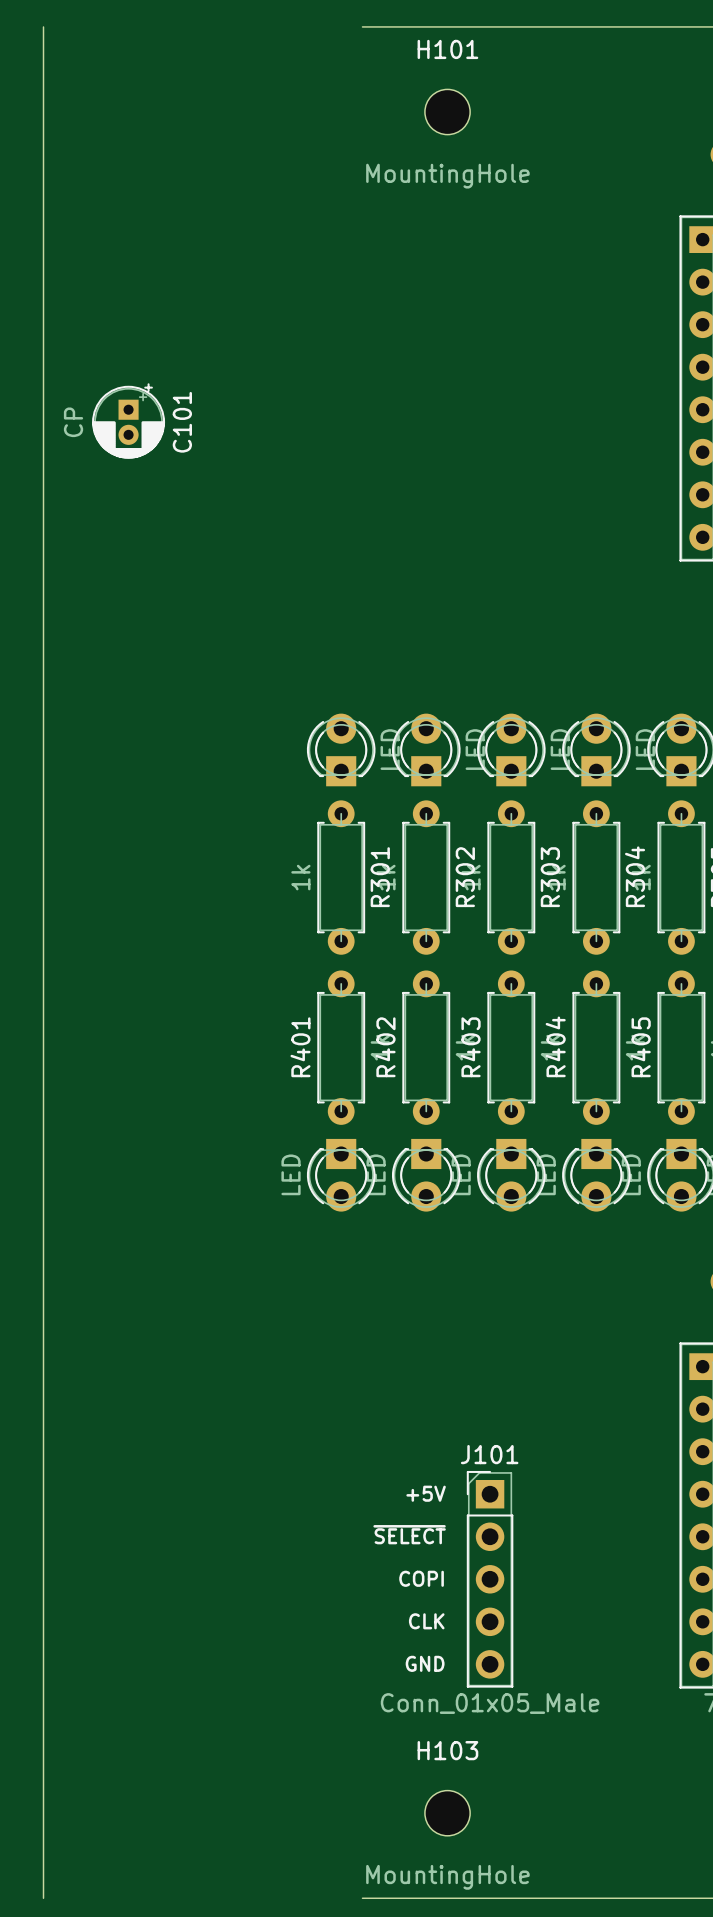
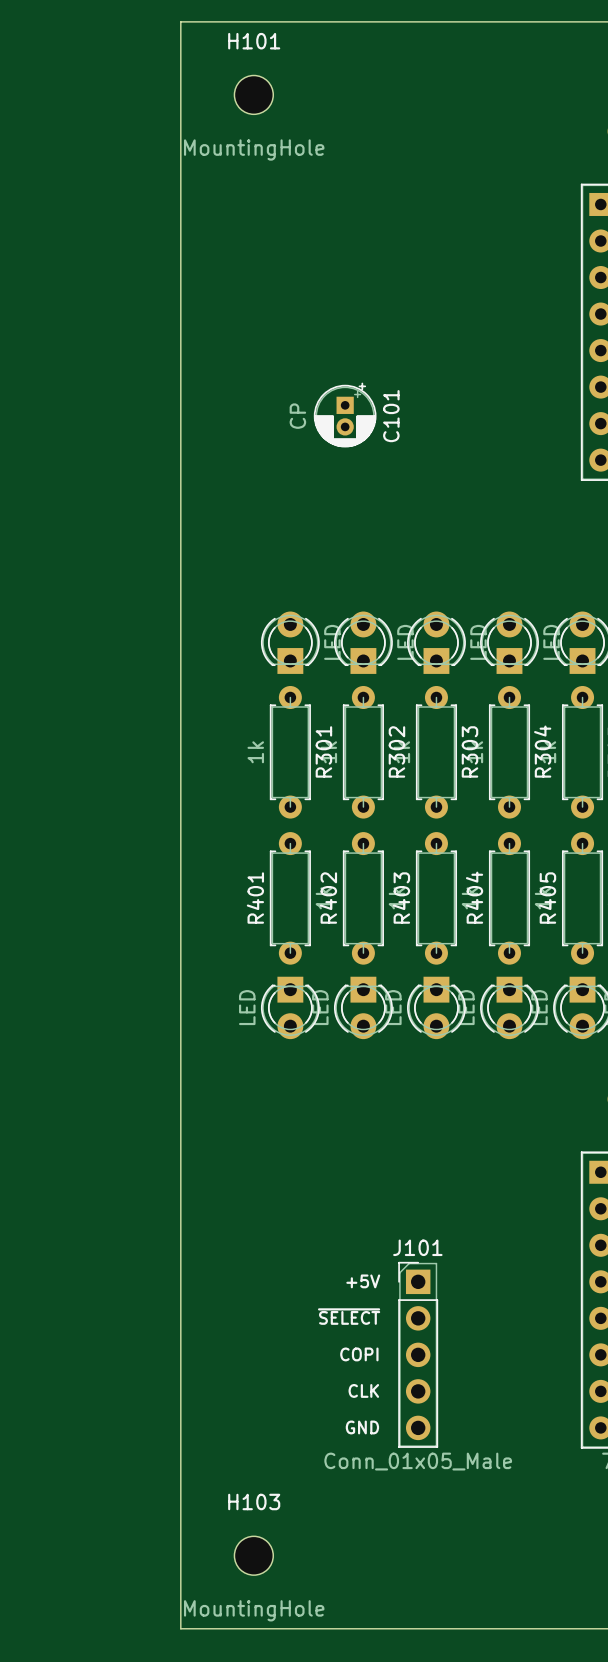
board edge: (43, 26) (43, 1898) -> none
board edge: none -> (308, 21) (180, 21) (180, 1628) (308, 1628)
H101 position: (447, 112) -> (253, 94)
C101 position: (128, 421) -> (345, 415)
H103 position: (447, 1813) -> (253, 1555)

